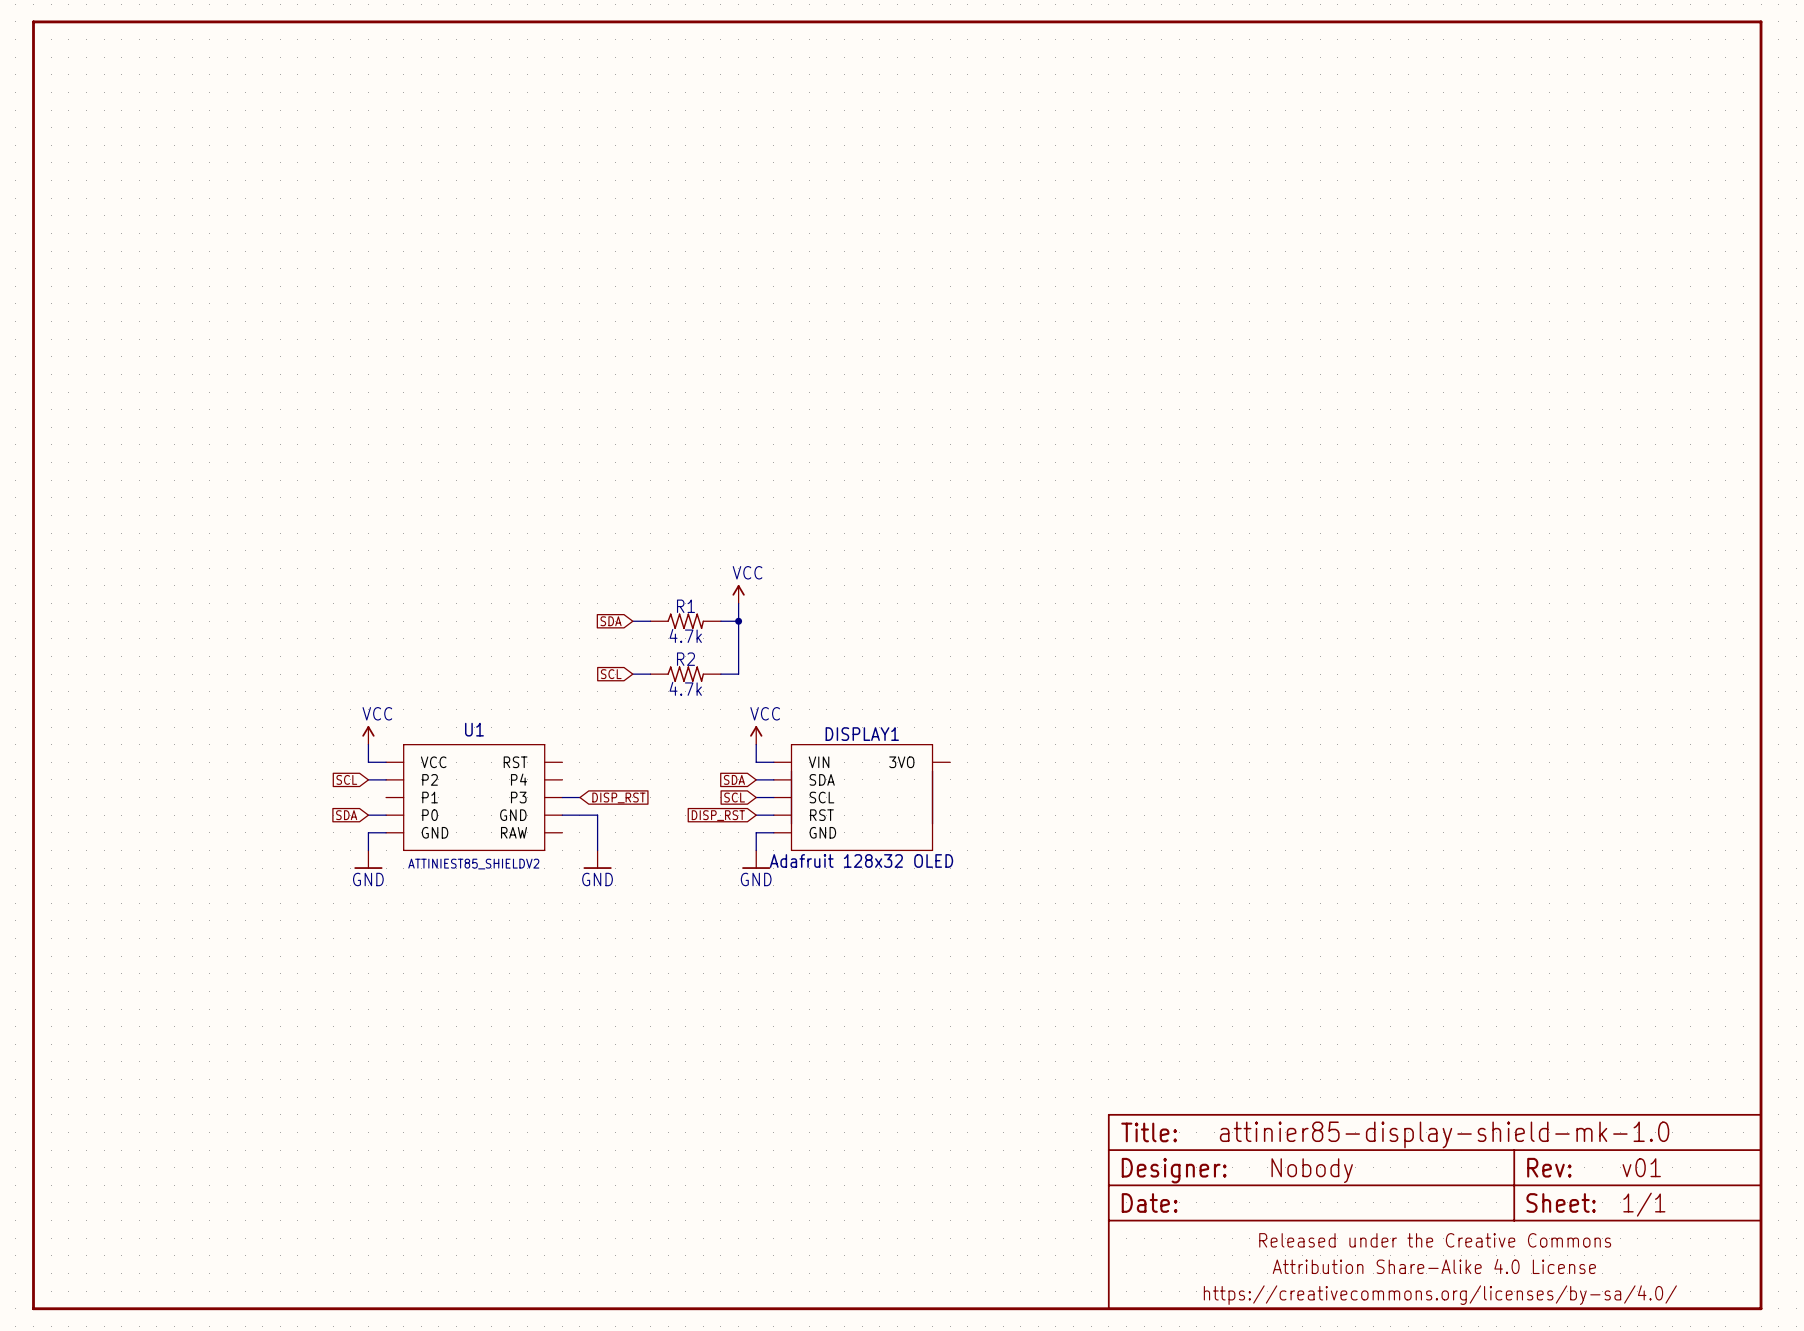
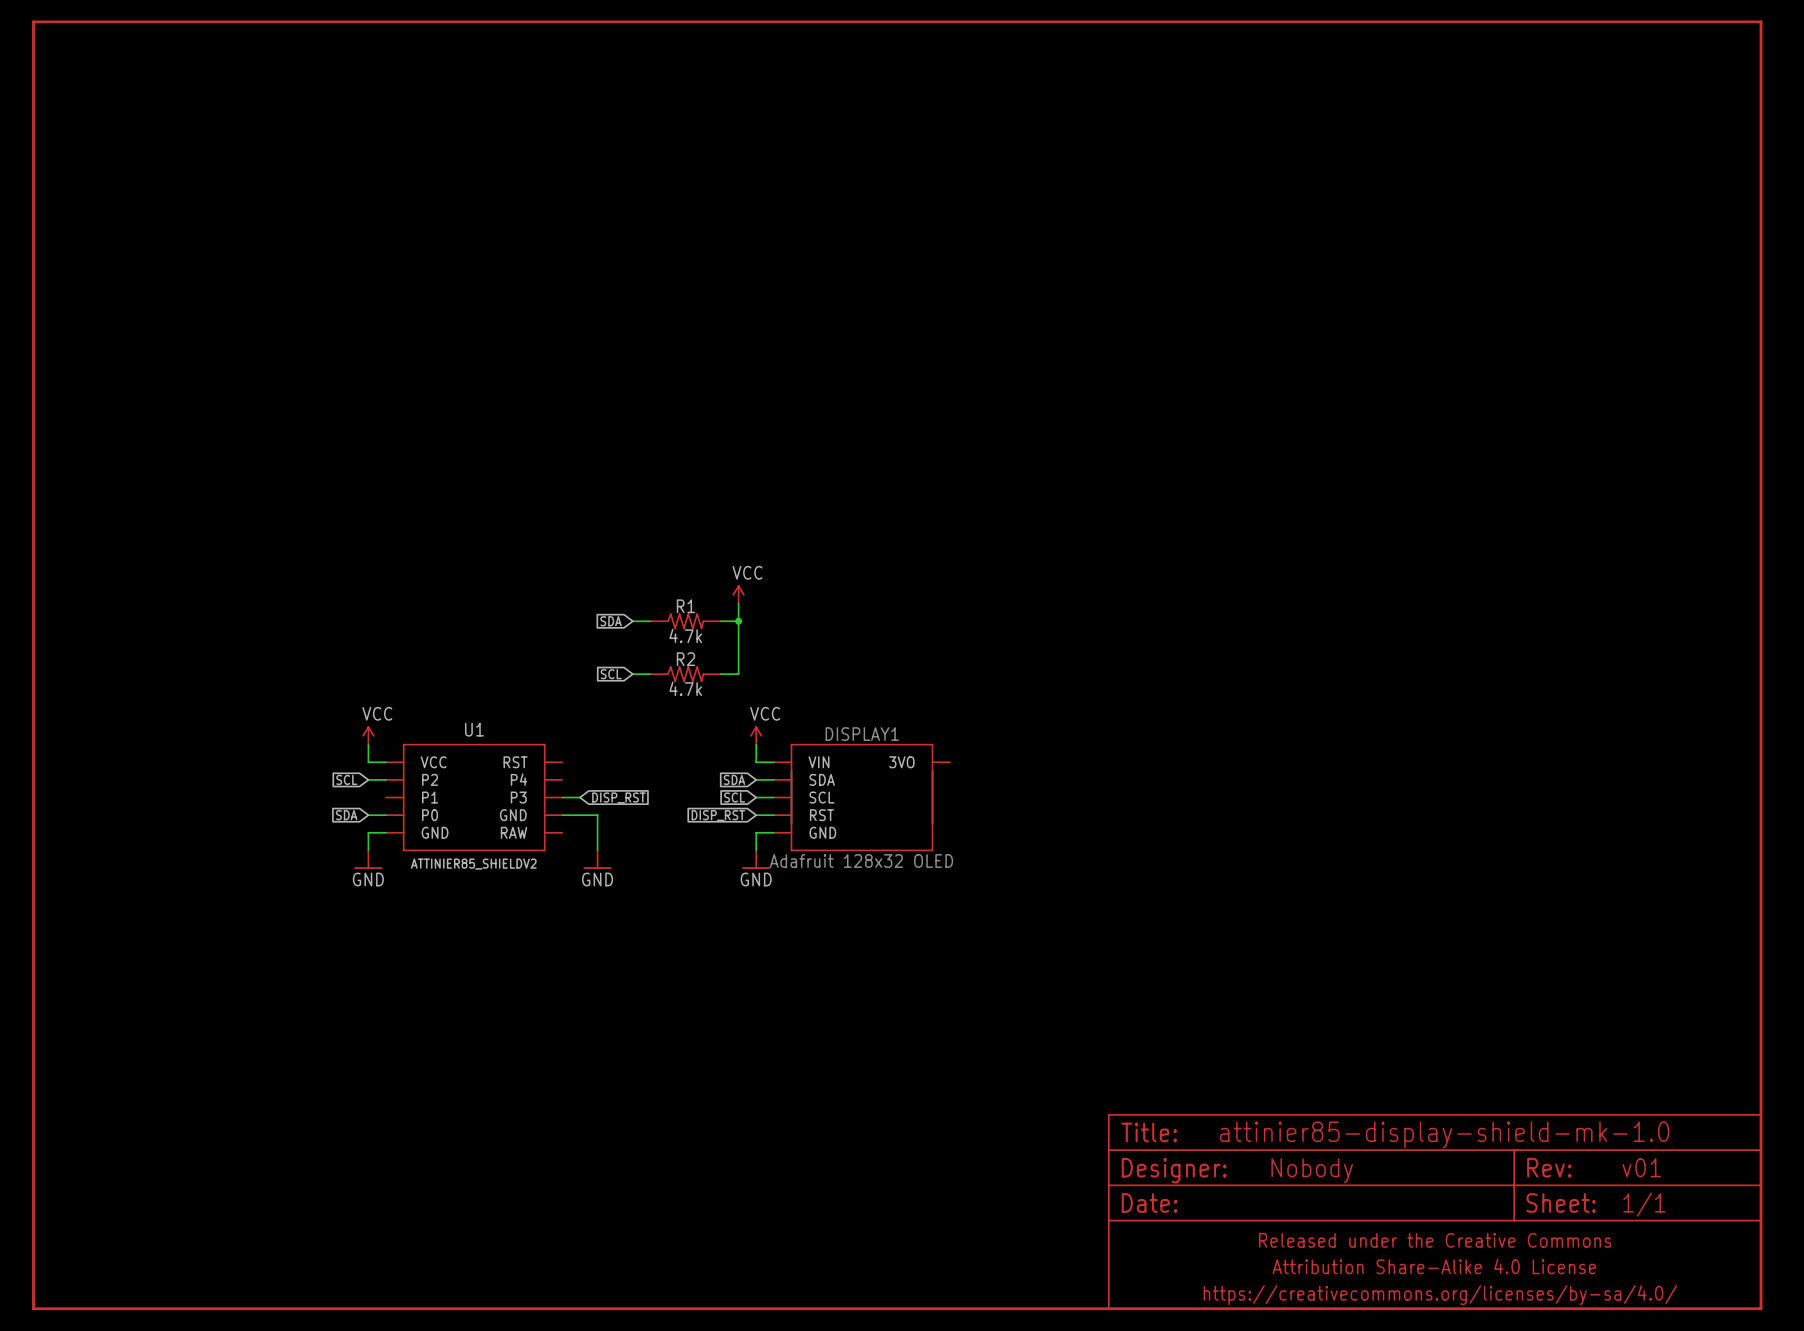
U1 value: ATTINIEST85_SHIELDV2 (473, 864) -> ATTINIER85_SHIELDV2 (473, 864)

